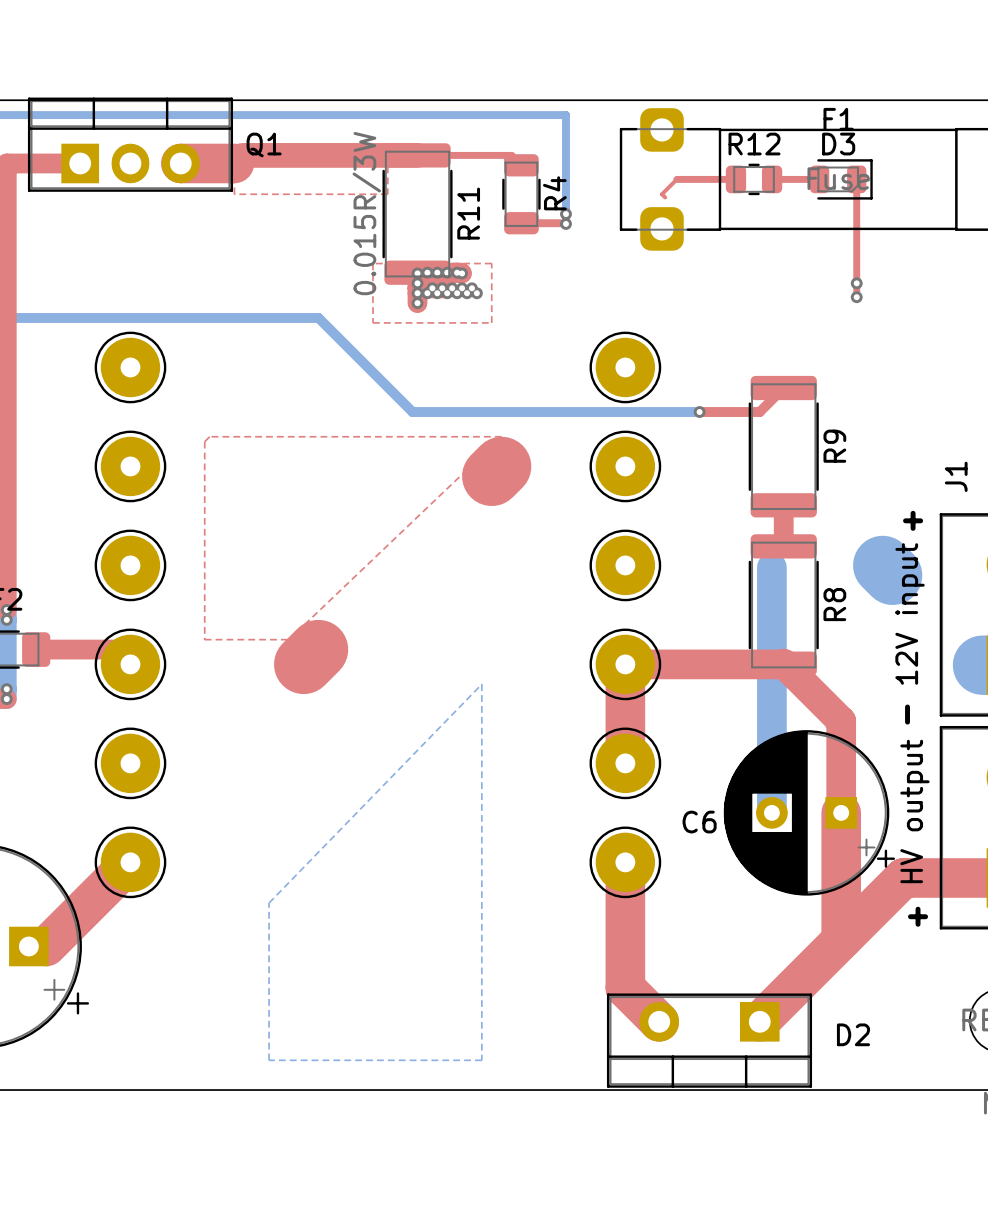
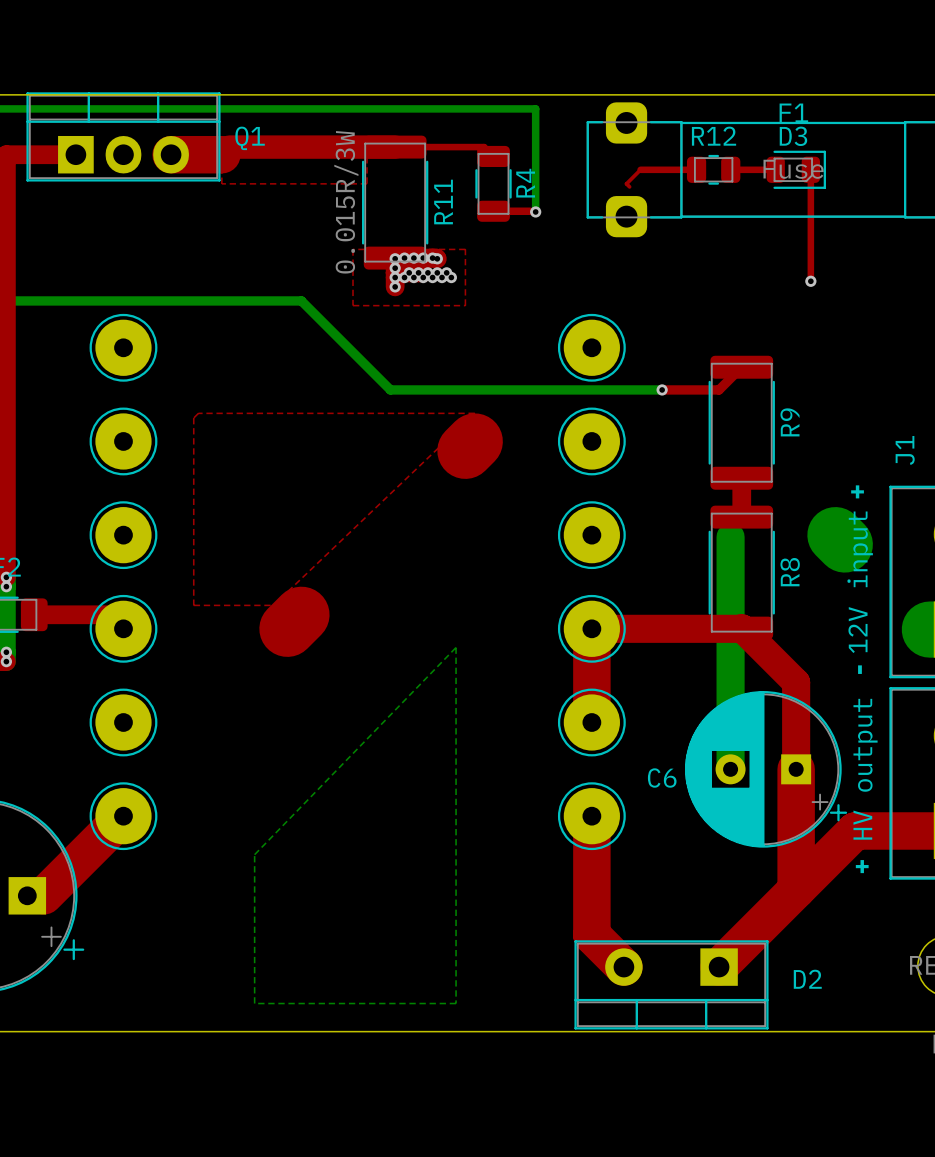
via: (565, 214) -> none
via: (856, 283) -> none

